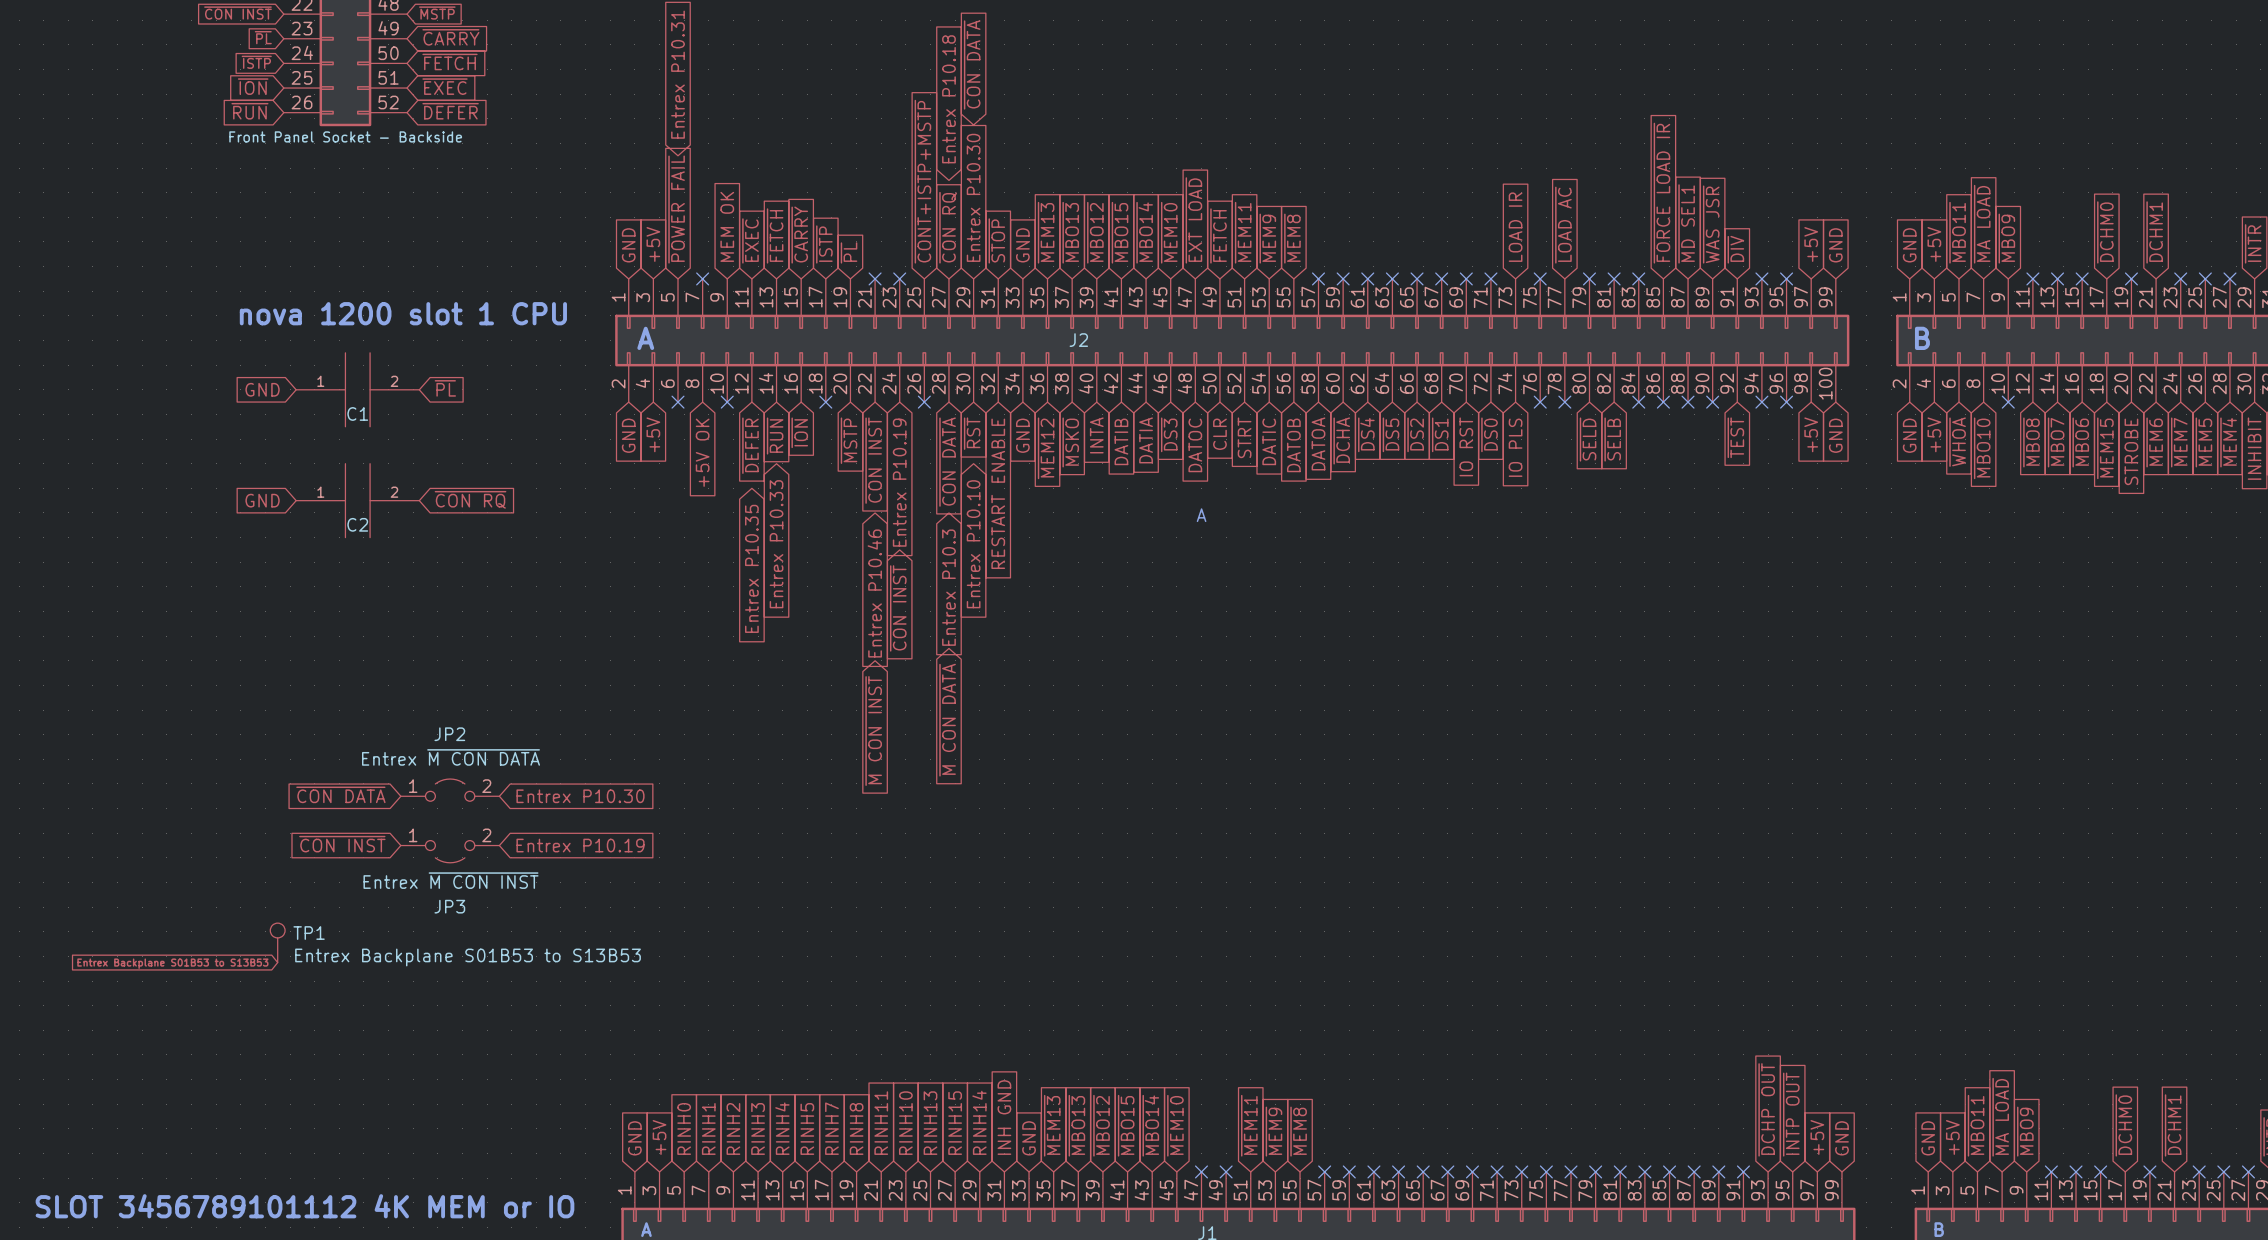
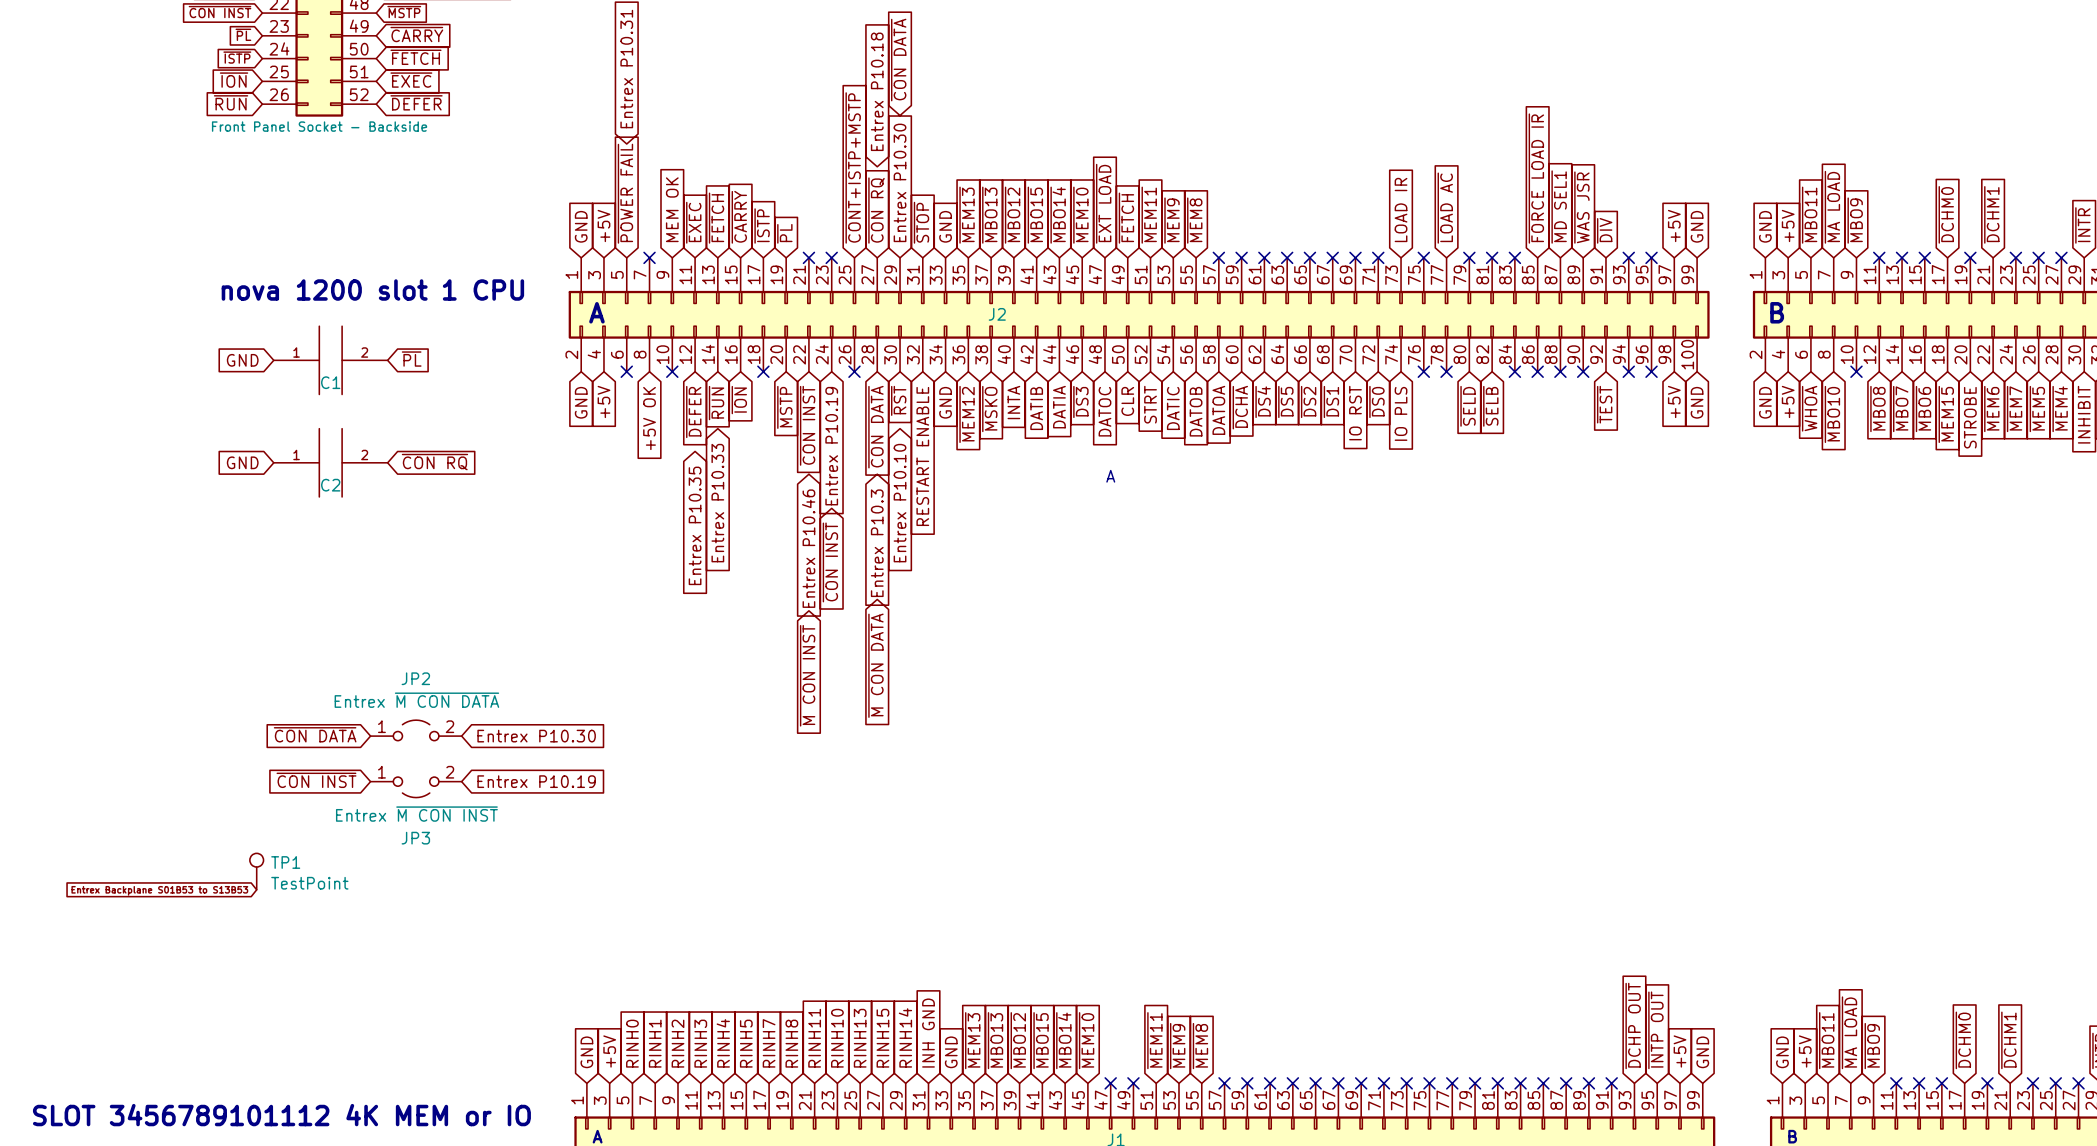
TP1 value: Entrex Backplane S01B53 to S13B53 (468, 957) -> TestPoint (309, 883)

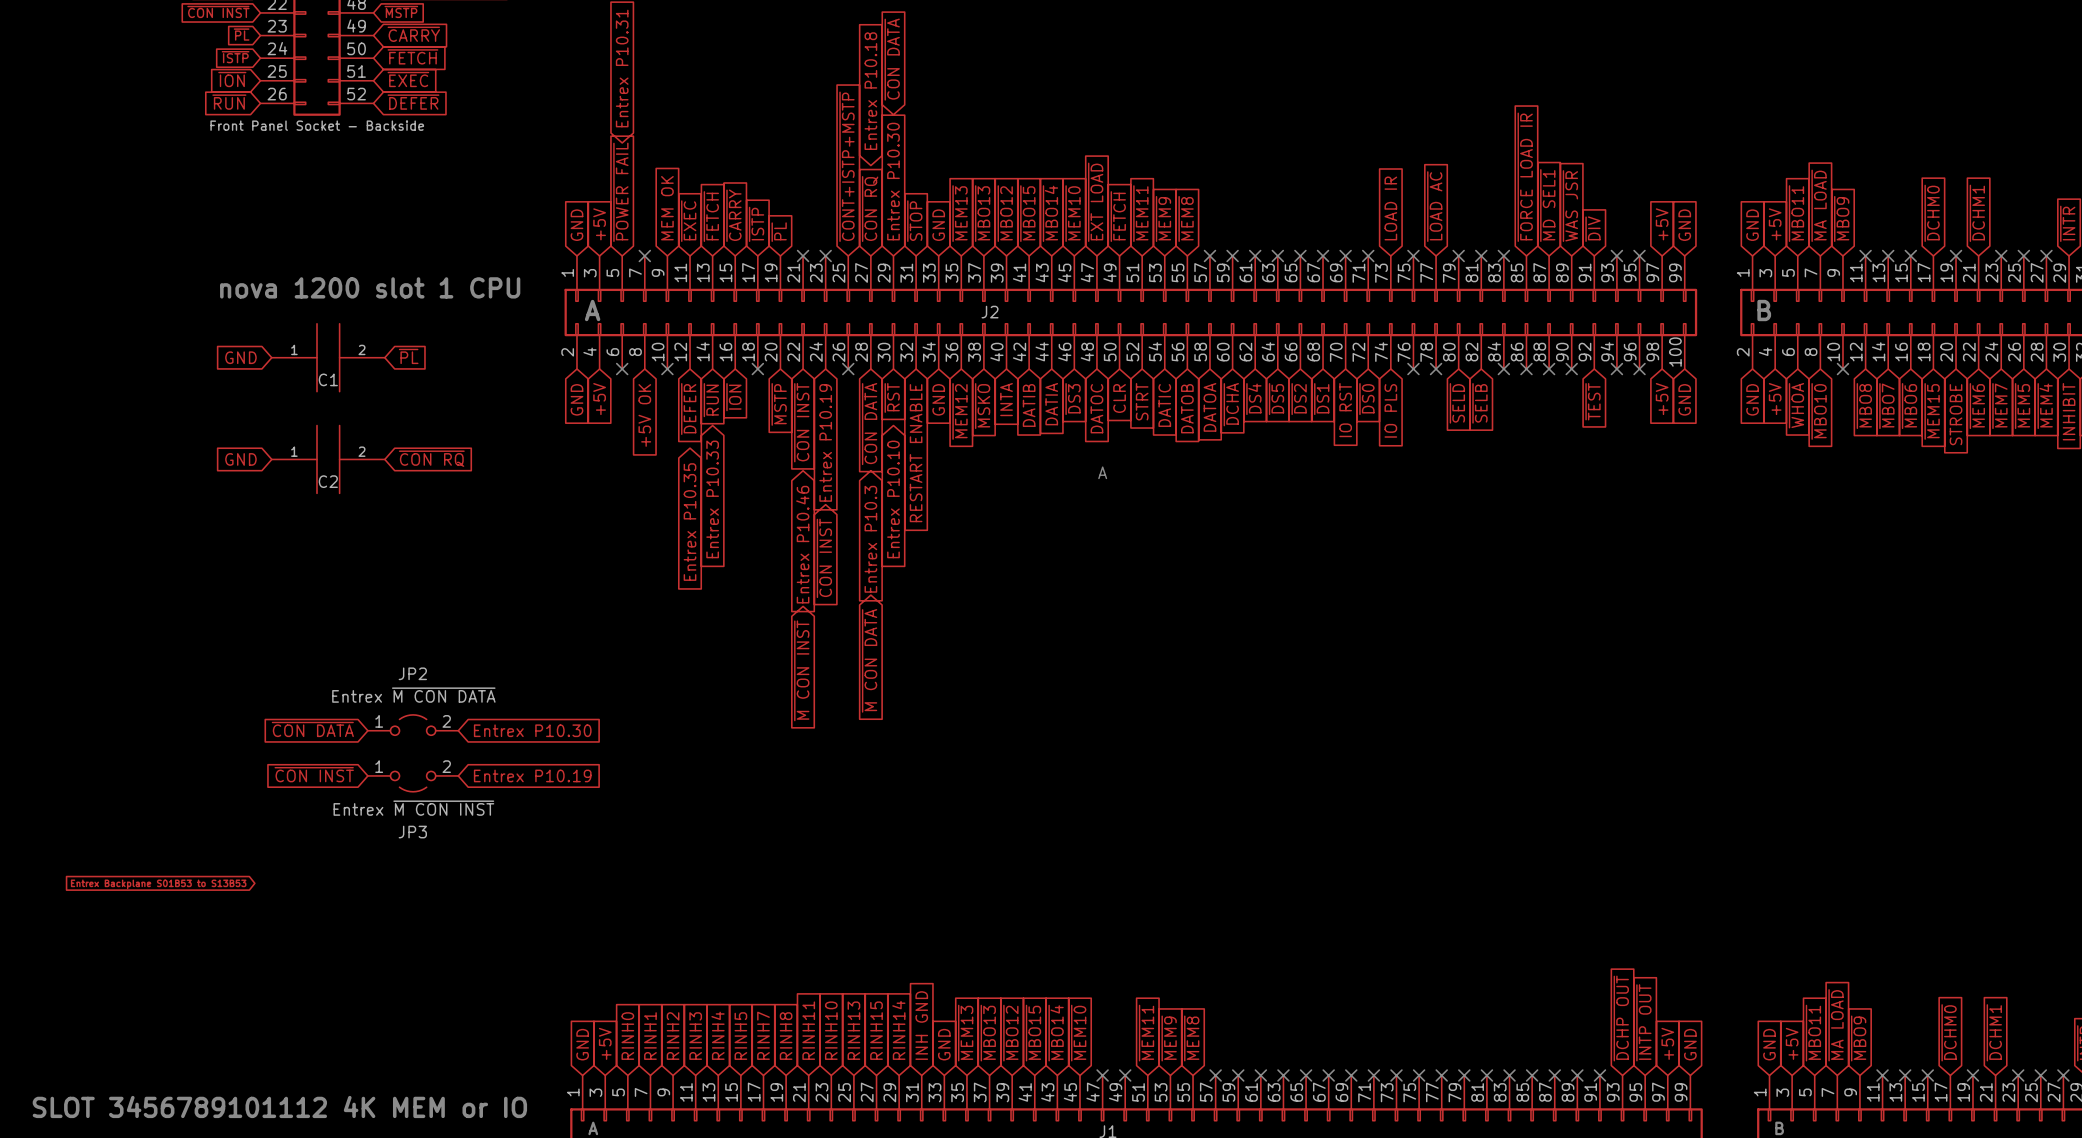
TP1: TestPoint (256, 871) -> none

